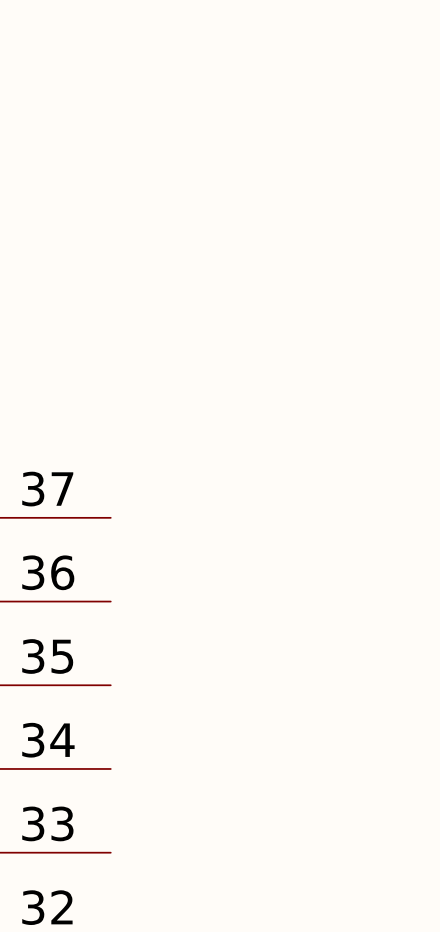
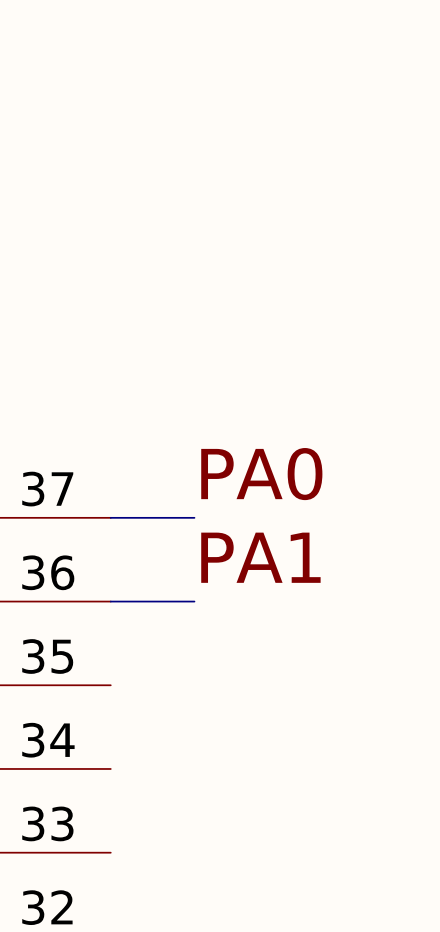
label: none -> PA0 (261, 474)
wire: none -> (110, 517) (194, 517)
label: none -> PA1 (260, 557)
wire: none -> (110, 601) (194, 601)

